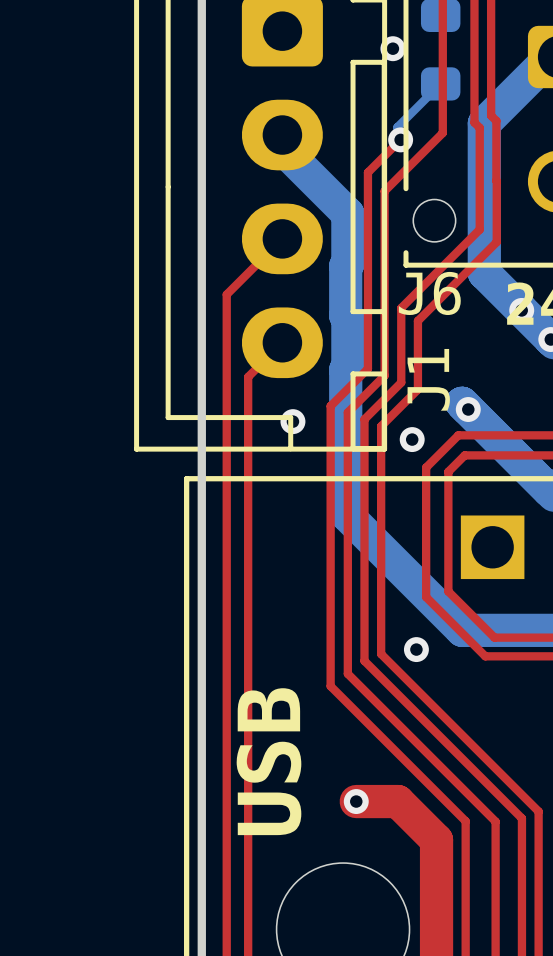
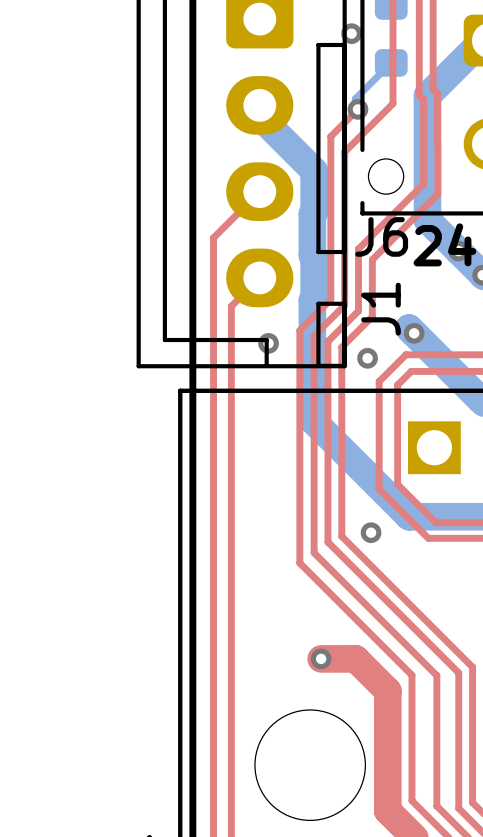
text: USB (268, 761) -> none

